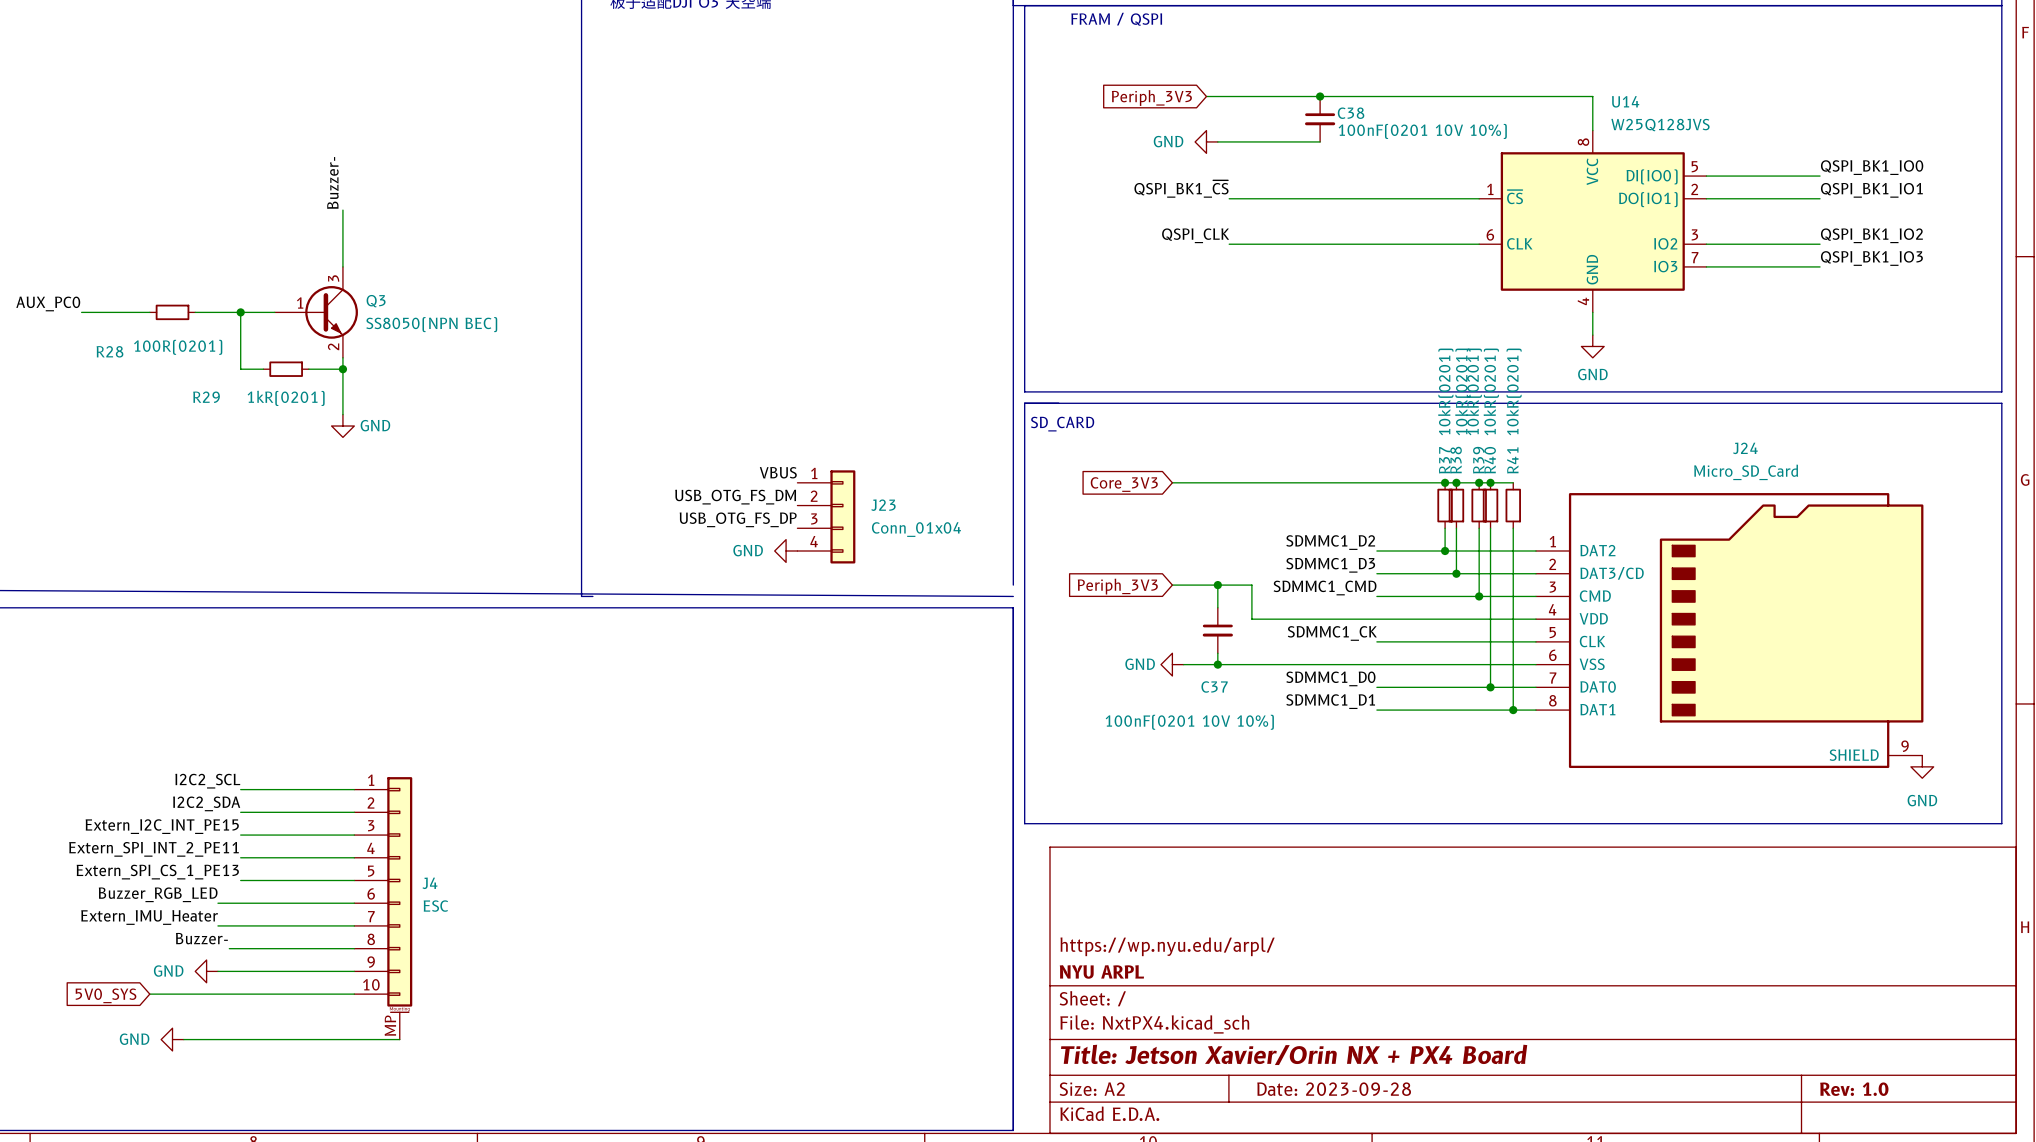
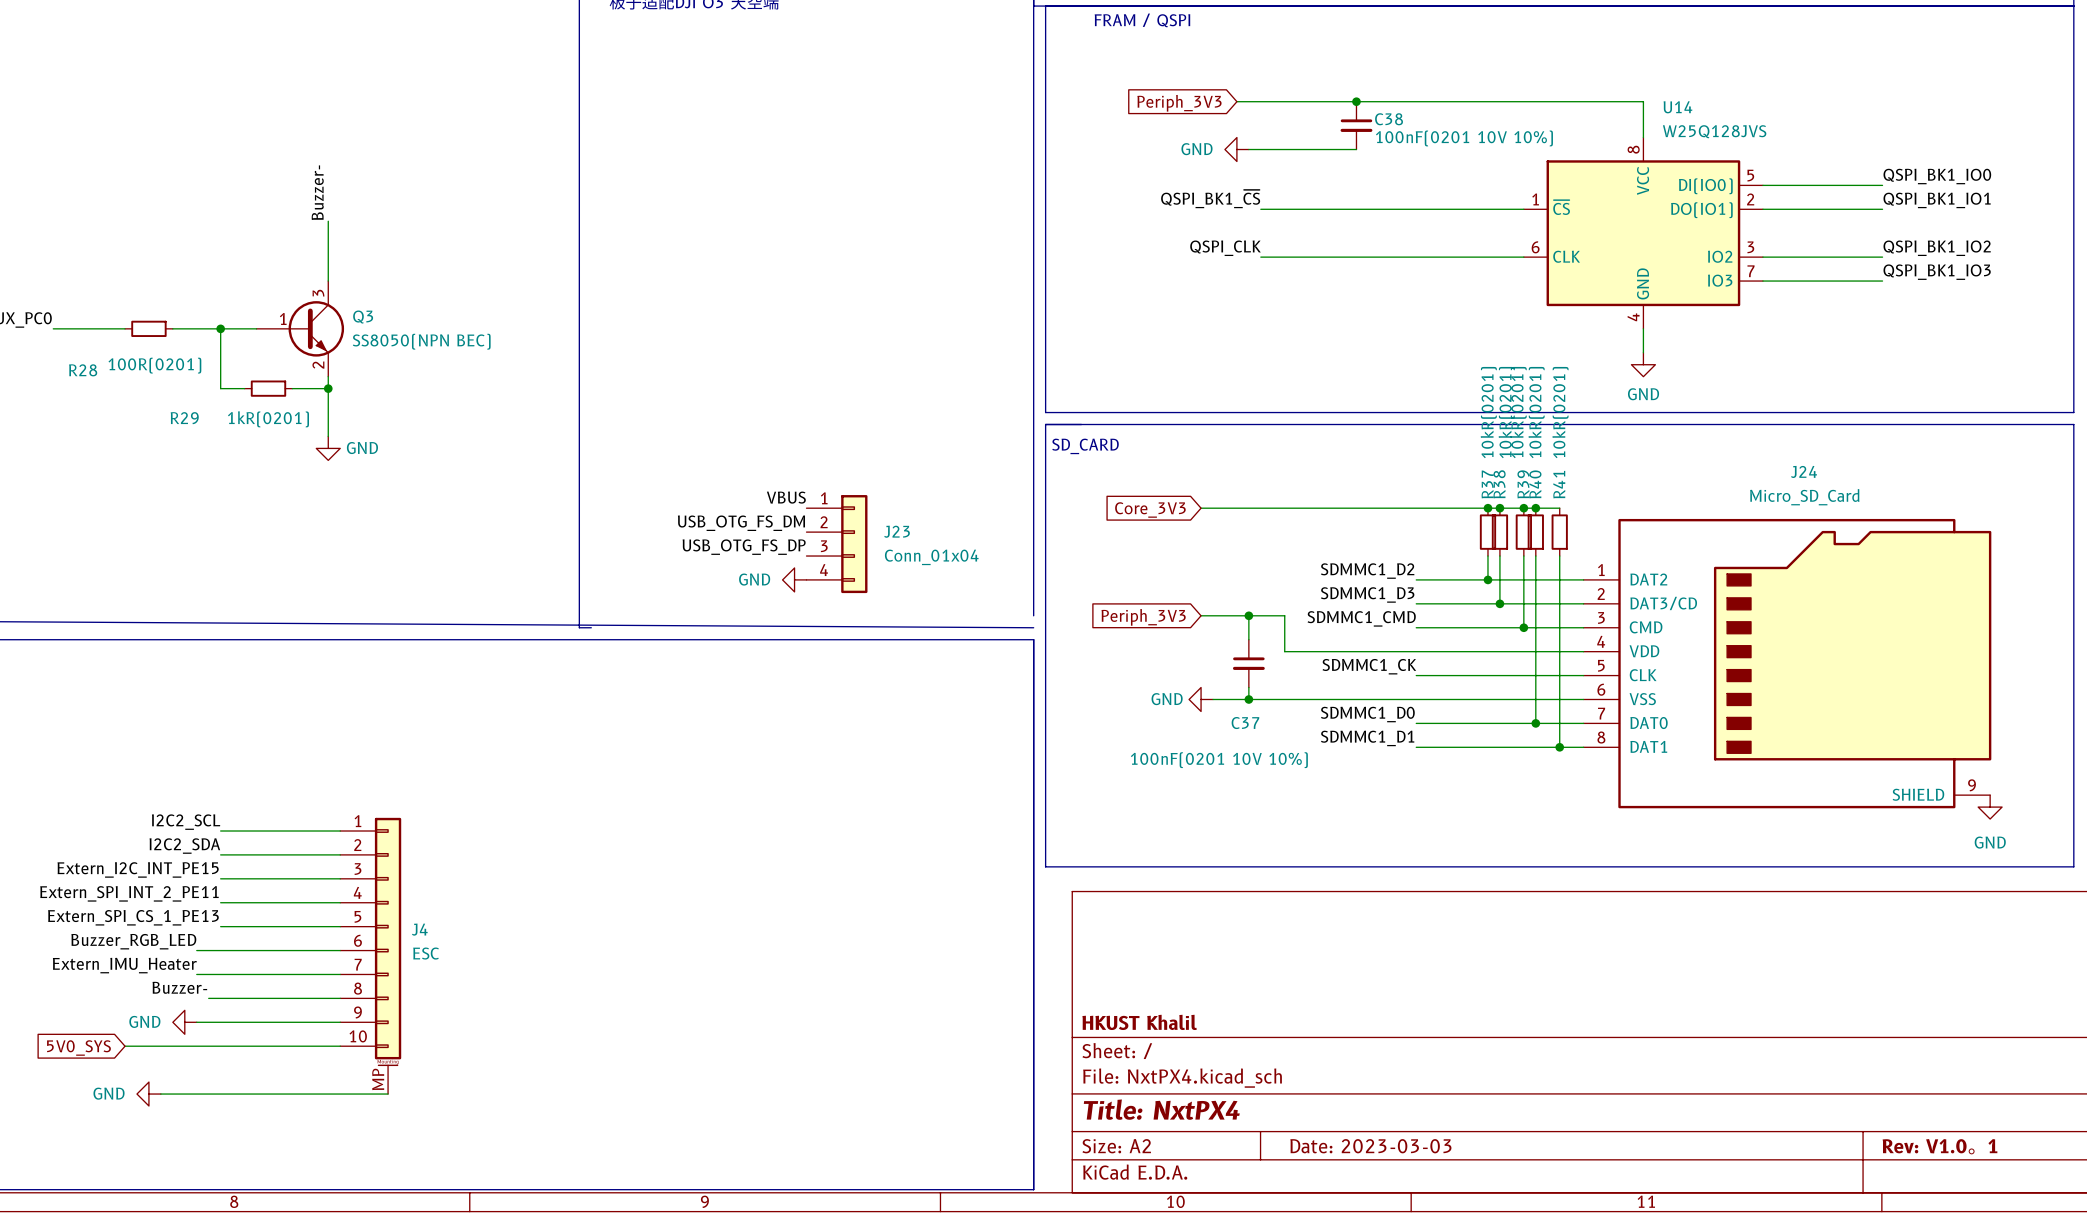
title block: https://wp.nyu.edu/arpl/ (1167, 946) -> none
title block: NYU ARPL (1101, 971) -> HKUST Khalil (1139, 1022)
title block: Title: Jetson Xavier/Orin NX + PX4 Board (1294, 1054) -> Title: NxtPX4 (1161, 1109)
title block: Date: 2023-09-28 (1334, 1089) -> Date: 2023-03-03 (1370, 1146)
title block: Rev: 1.0 (1854, 1089) -> Rev: V1.0。1 (1940, 1146)

